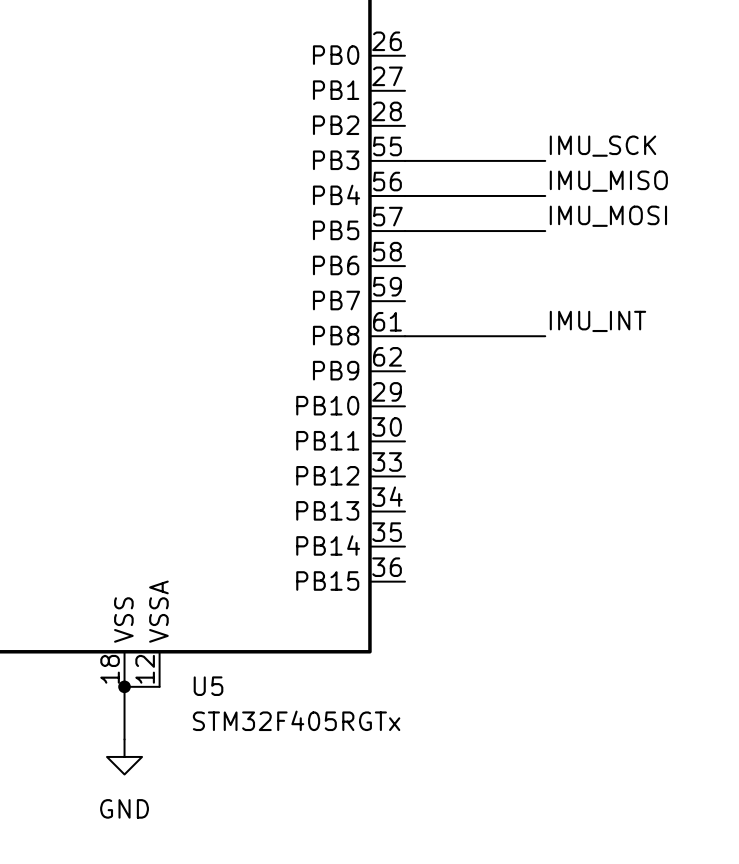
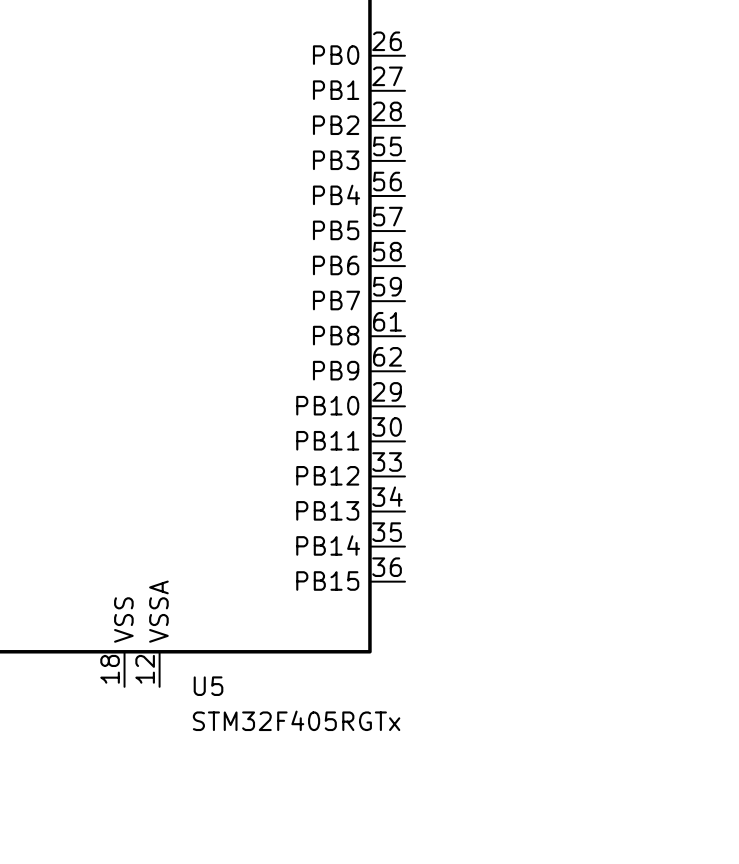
label: IMU_SCK (602, 146) -> none
wire: (405, 160) (545, 160) -> none
label: IMU_MISO (608, 181) -> none
wire: (405, 195) (545, 195) -> none
label: IMU_MOSI (608, 216) -> none
wire: (405, 231) (545, 231) -> none
label: IMU_INT (597, 321) -> none
wire: (405, 336) (545, 336) -> none
junction: (124, 686) -> none
wire: (159, 686) (124, 686) (124, 739) -> none
power symbol: GND (124, 756) -> none

